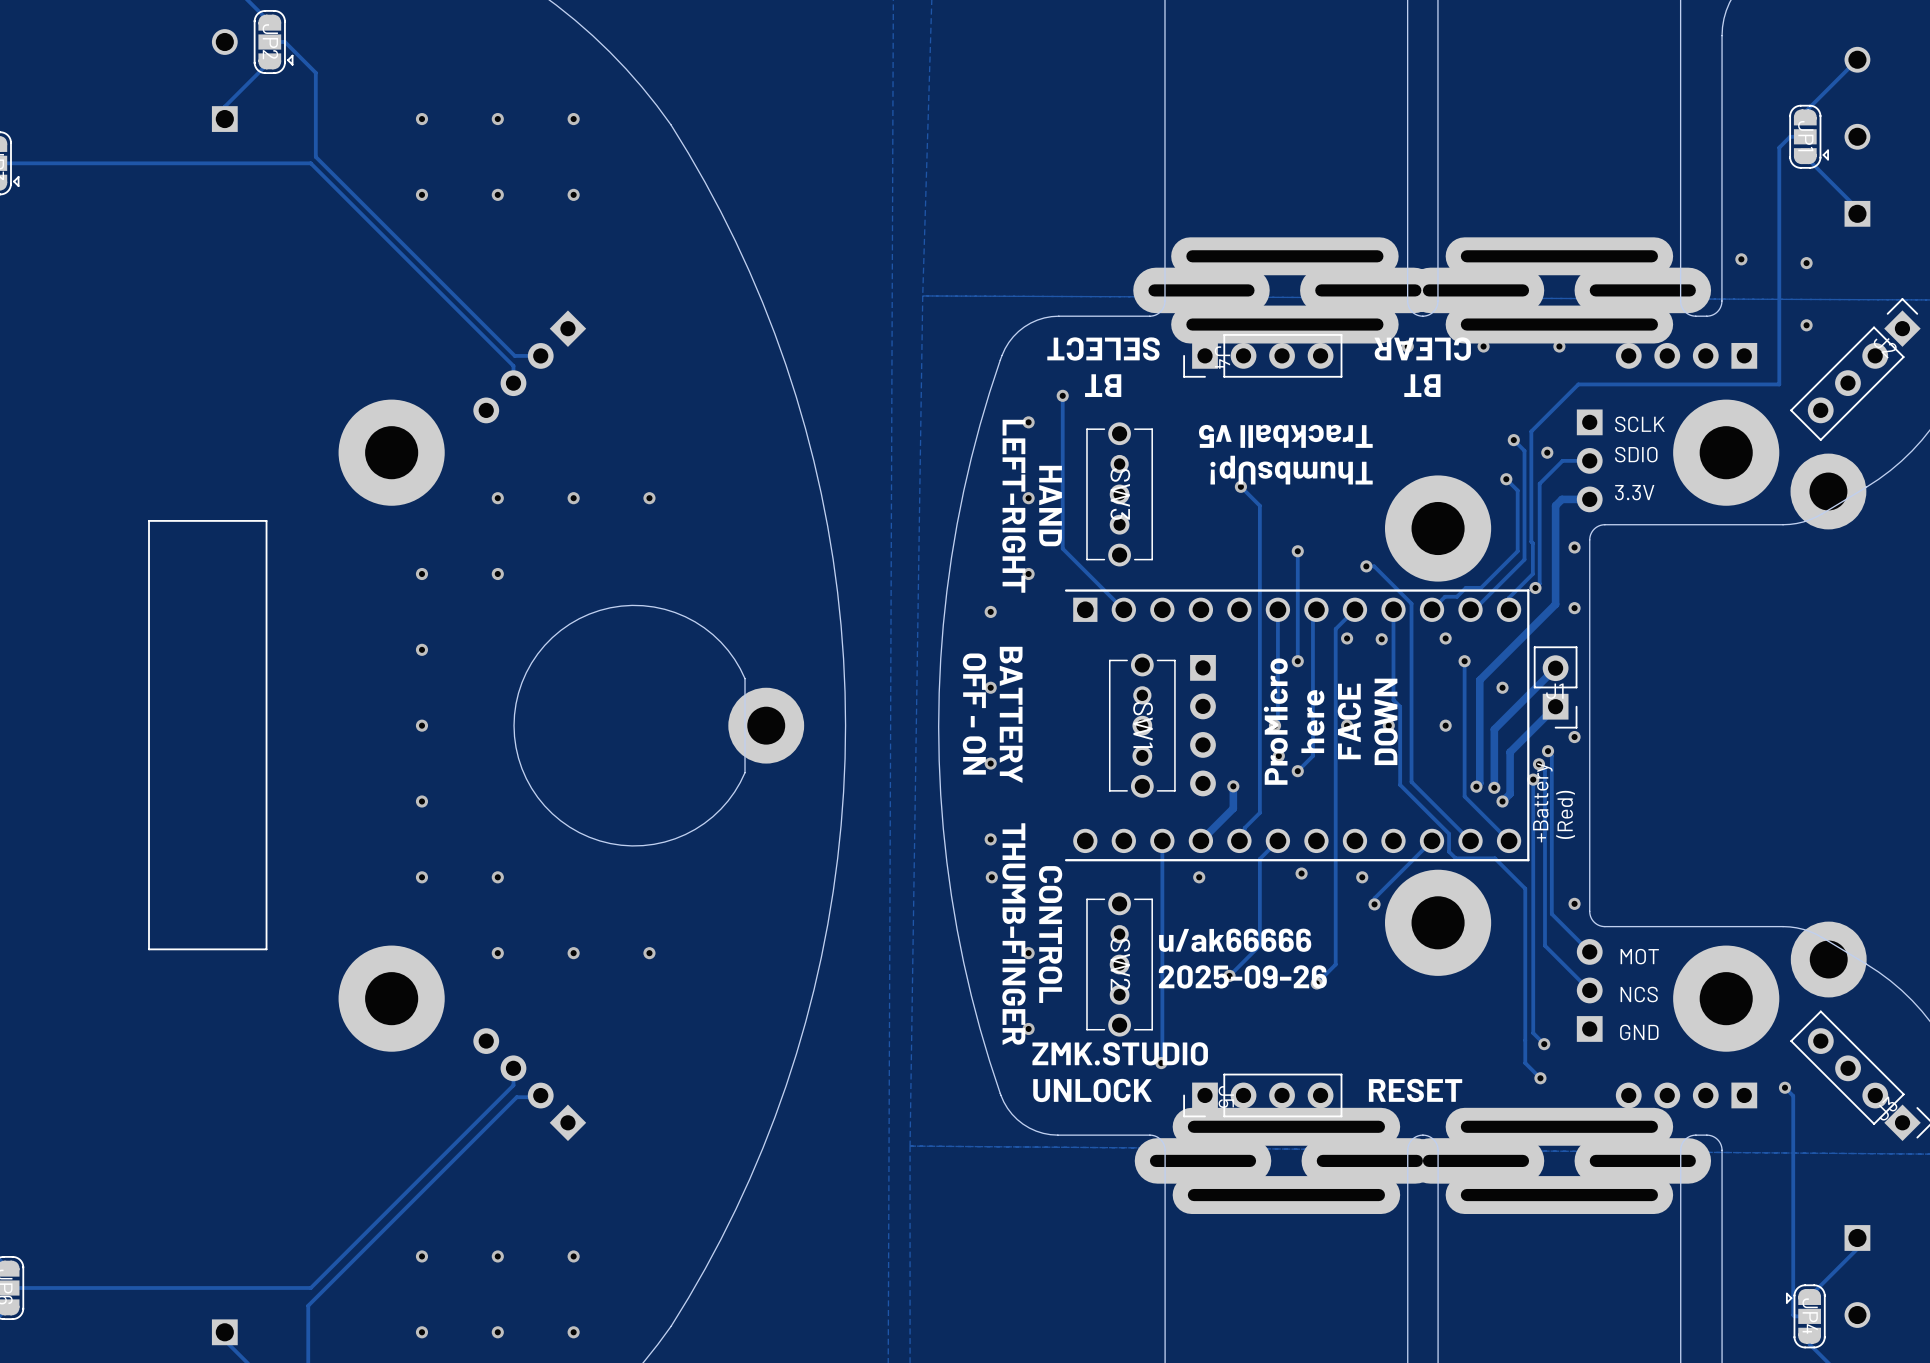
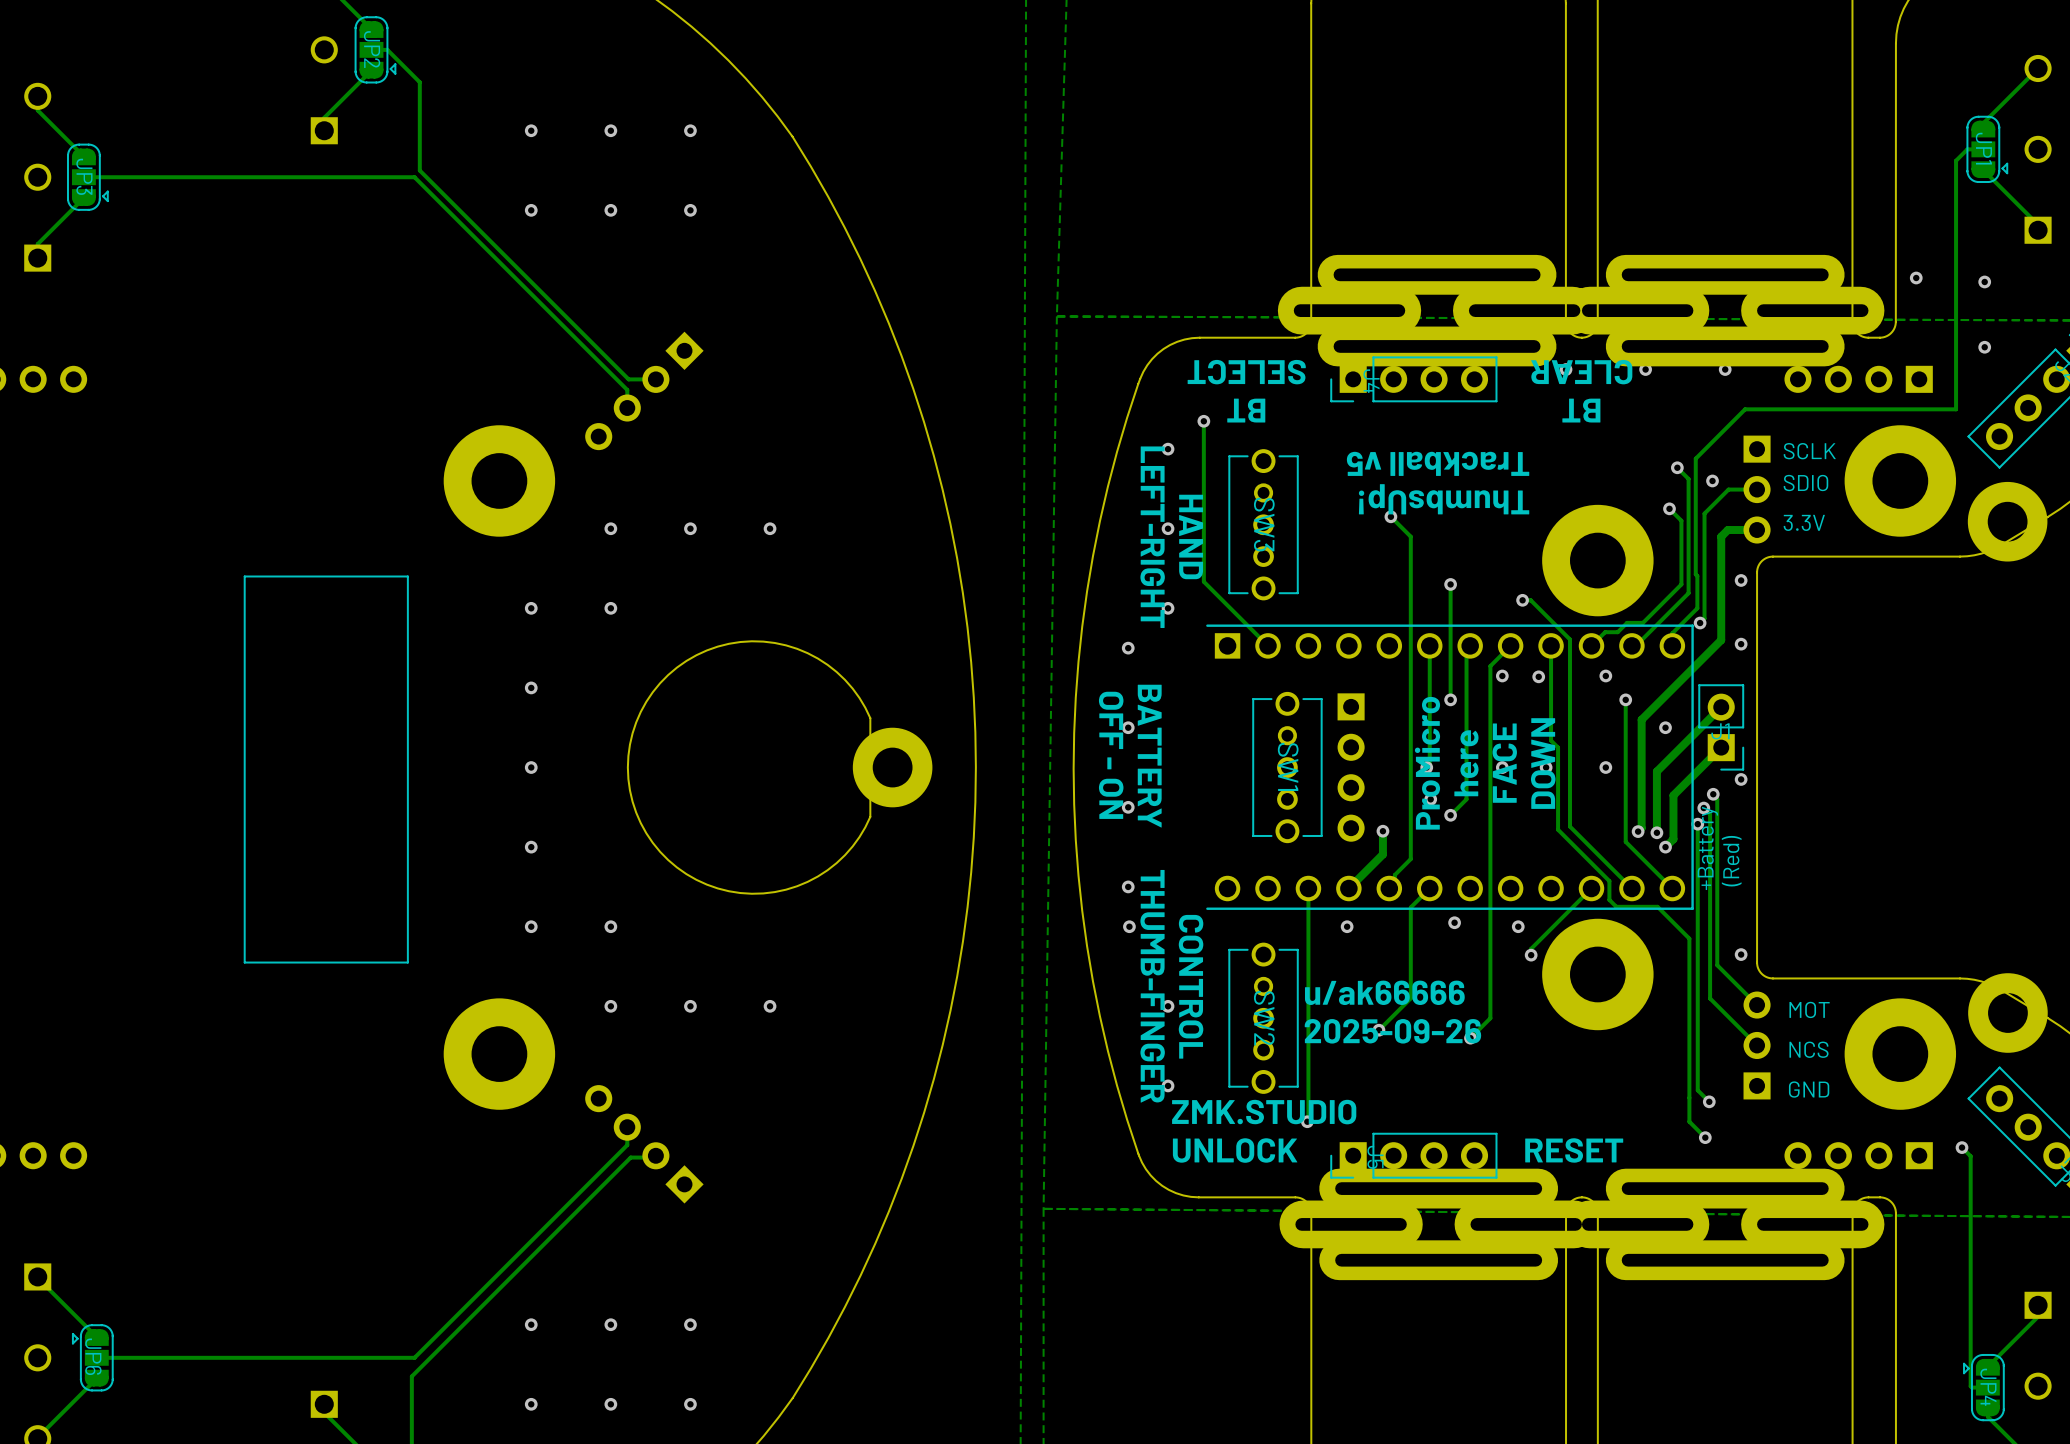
line: (149, 543) (149, 520) (266, 520) (266, 949) (149, 949) (149, 911) -> (244, 576) (407, 576) (407, 962) (244, 962)

